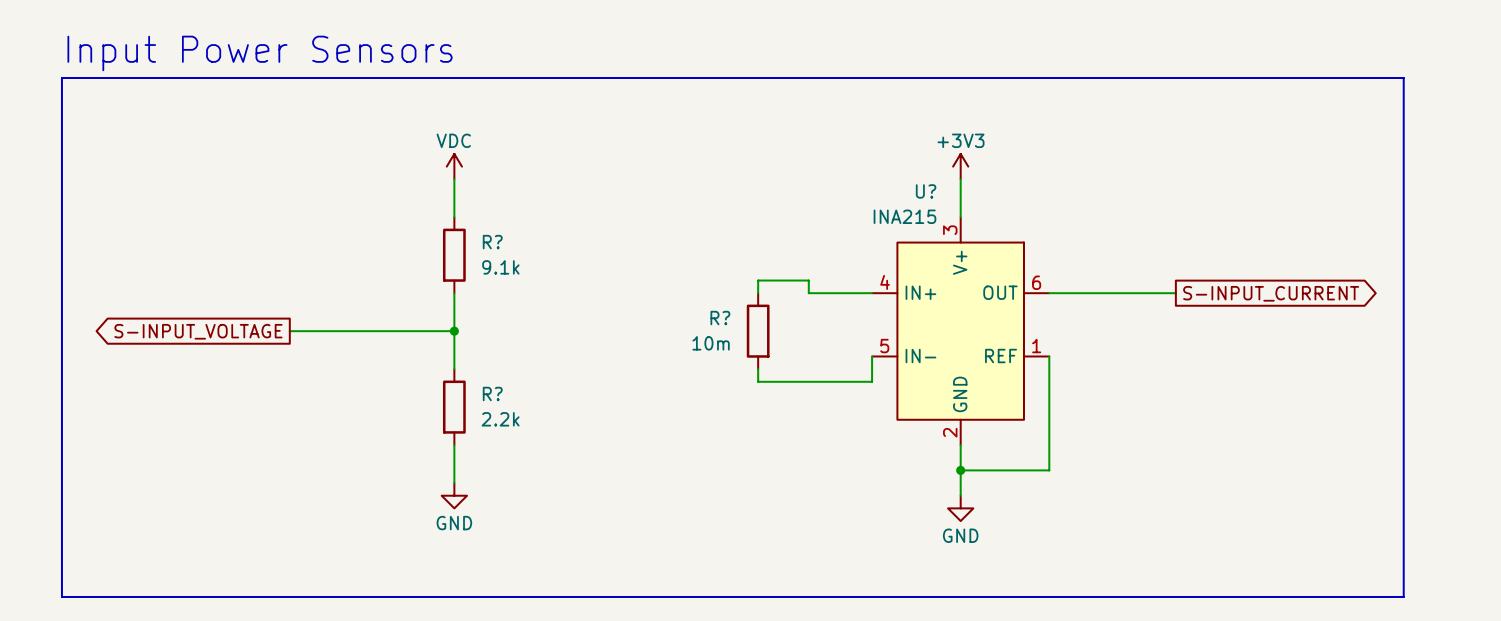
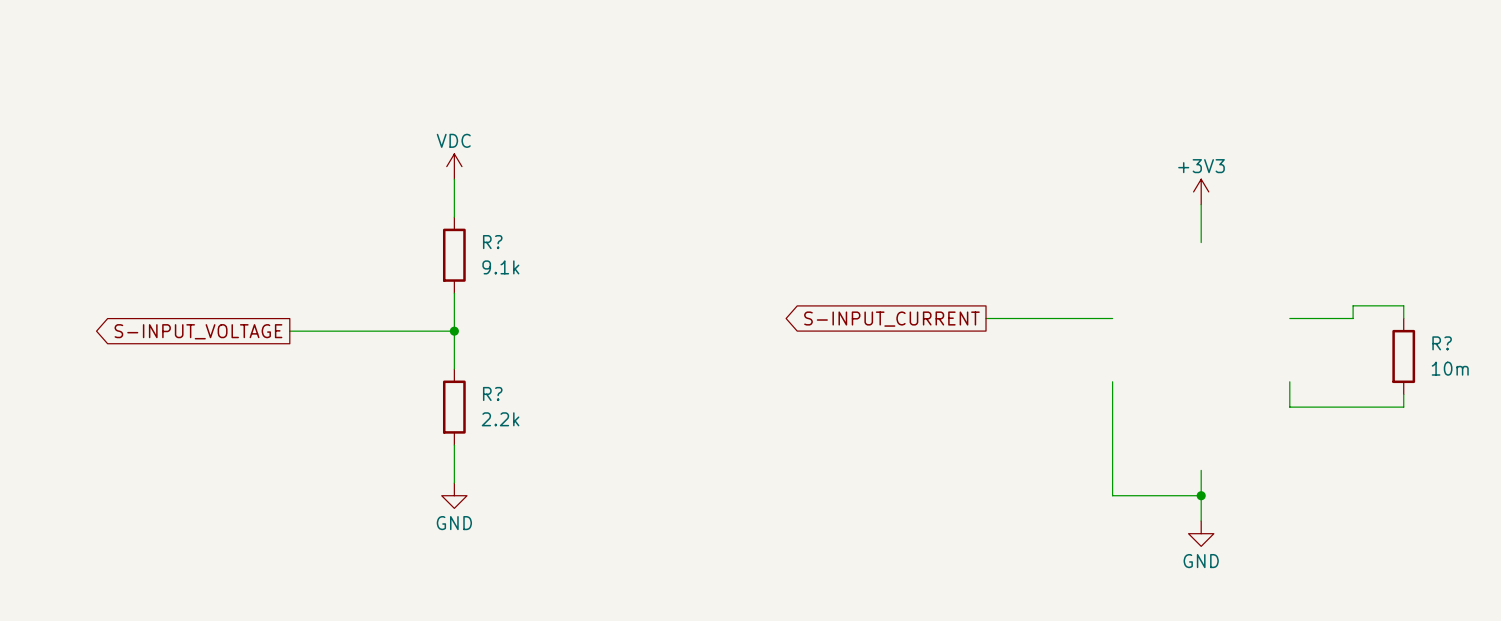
text: Input Power Sensors (260, 53) -> none
line: (61, 78) (1403, 78) (1403, 596) (61, 596) (61, 78) -> none
power symbol position: +3V3 (960, 166) -> +3V3 (1201, 191)
wire: (960, 179) (960, 217) -> (1201, 204) (1201, 242)
wire: (758, 293) (758, 280) (808, 280) (808, 293) (872, 293) -> none
wire: (1049, 293) (1175, 293) -> (986, 318) (1112, 318)
global label rotation: 0° (1271, 293) -> 180° (891, 319)
global label position: S-INPUT_CURRENT (1271, 293) -> S-INPUT_CURRENT (891, 319)
wire: none -> (1289, 318) (1353, 318) (1353, 305) (1403, 305) (1403, 318)
R?: 10m (758, 331) -> none
U?: INA215 (960, 331) -> none
wire: (872, 356) (872, 381) (758, 381) (758, 369) -> none
wire: (1049, 356) (1049, 470) (960, 470) -> none
R?: none -> 10m (1403, 356)
wire: none -> (1112, 381) (1112, 495) (1201, 495)
wire: none -> (1289, 381) (1289, 407) (1403, 407) (1403, 394)
wire: (960, 445) (960, 495) -> (1201, 470) (1201, 521)
junction: (960, 470) -> none
junction: none -> (1201, 495)
power symbol position: GND (960, 508) -> GND (1201, 533)

